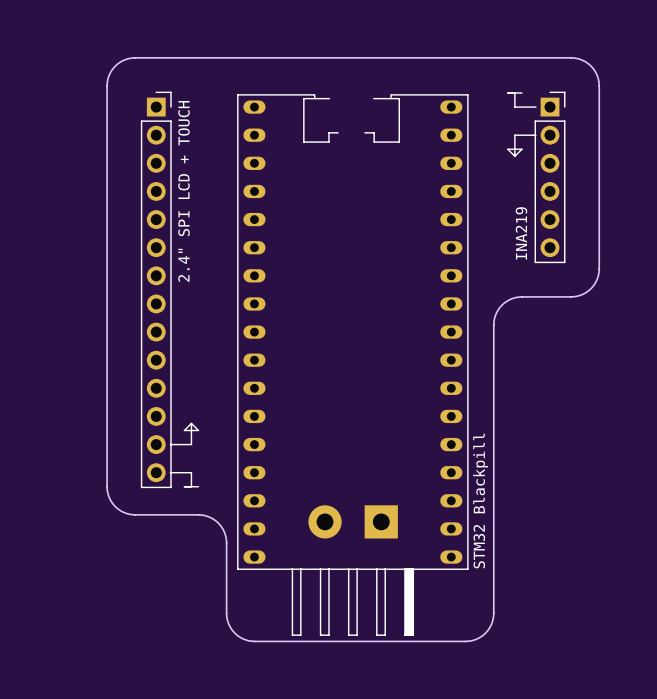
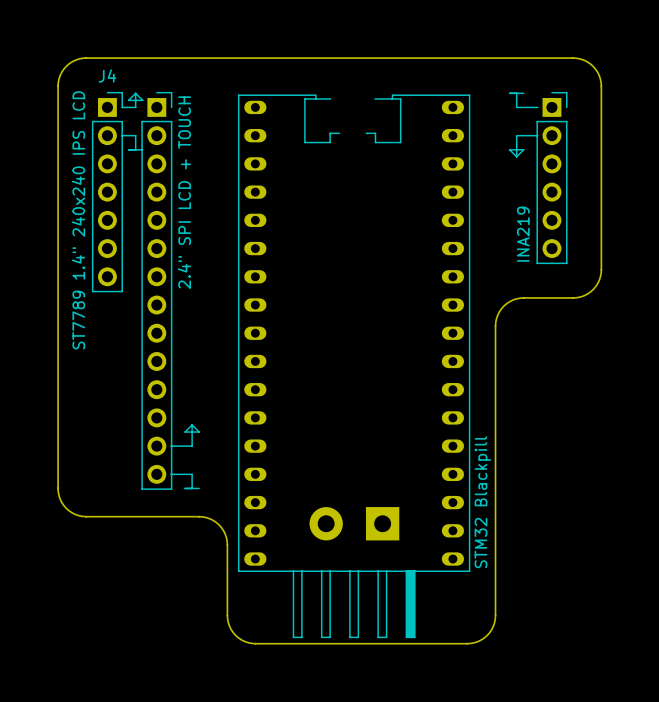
board edge: (135, 57) (124, 59) (115, 66) (109, 75) (107, 85) (107, 490) (115, 506) (124, 512) (135, 514) -> (135, 58) (78, 59) (63, 69) (58, 82) (58, 488) (60, 499) (66, 508) (75, 514) (86, 516)
line: none -> (135, 93) (135, 107) (122, 107)
line: none -> (135, 93) (142, 100) (128, 100) (135, 93)
line: none -> (121, 135) (135, 135) (135, 149)
line: none -> (128, 149) (142, 149)
J4: none -> (107, 192)
text: none -> ST7789 1.4" 240x240 IPS LCD (78, 220)
board edge: none -> (86, 516) (135, 516)

